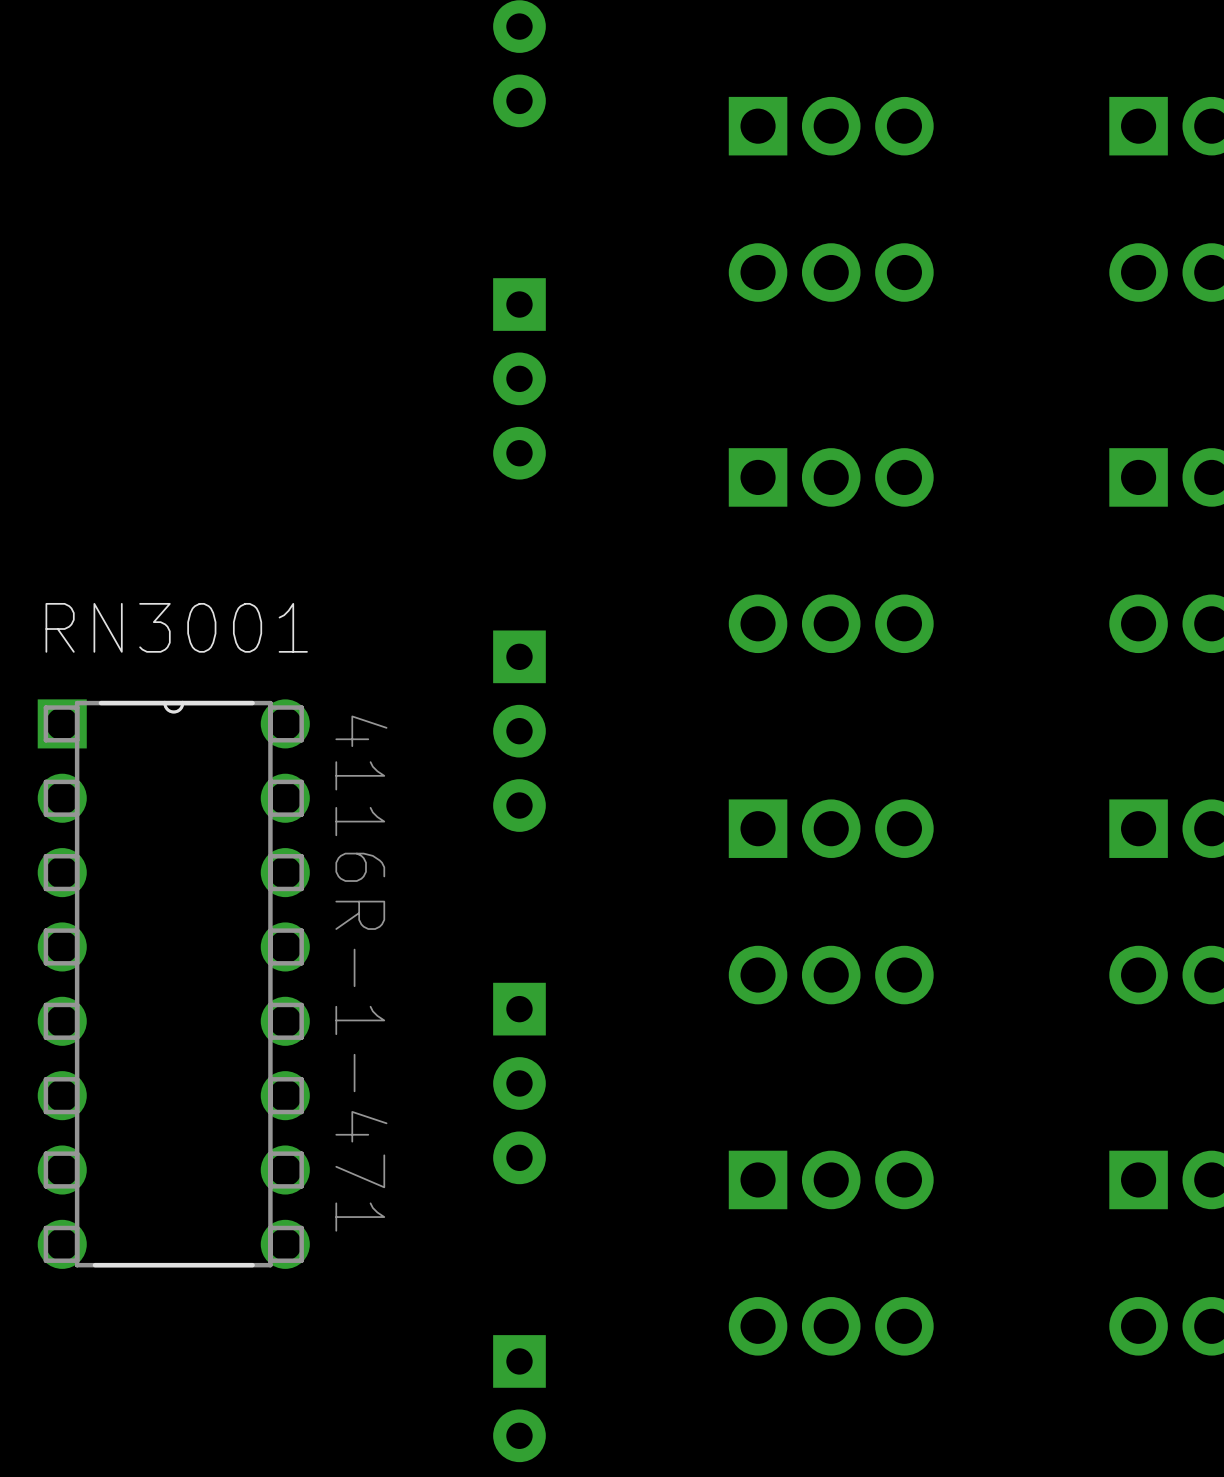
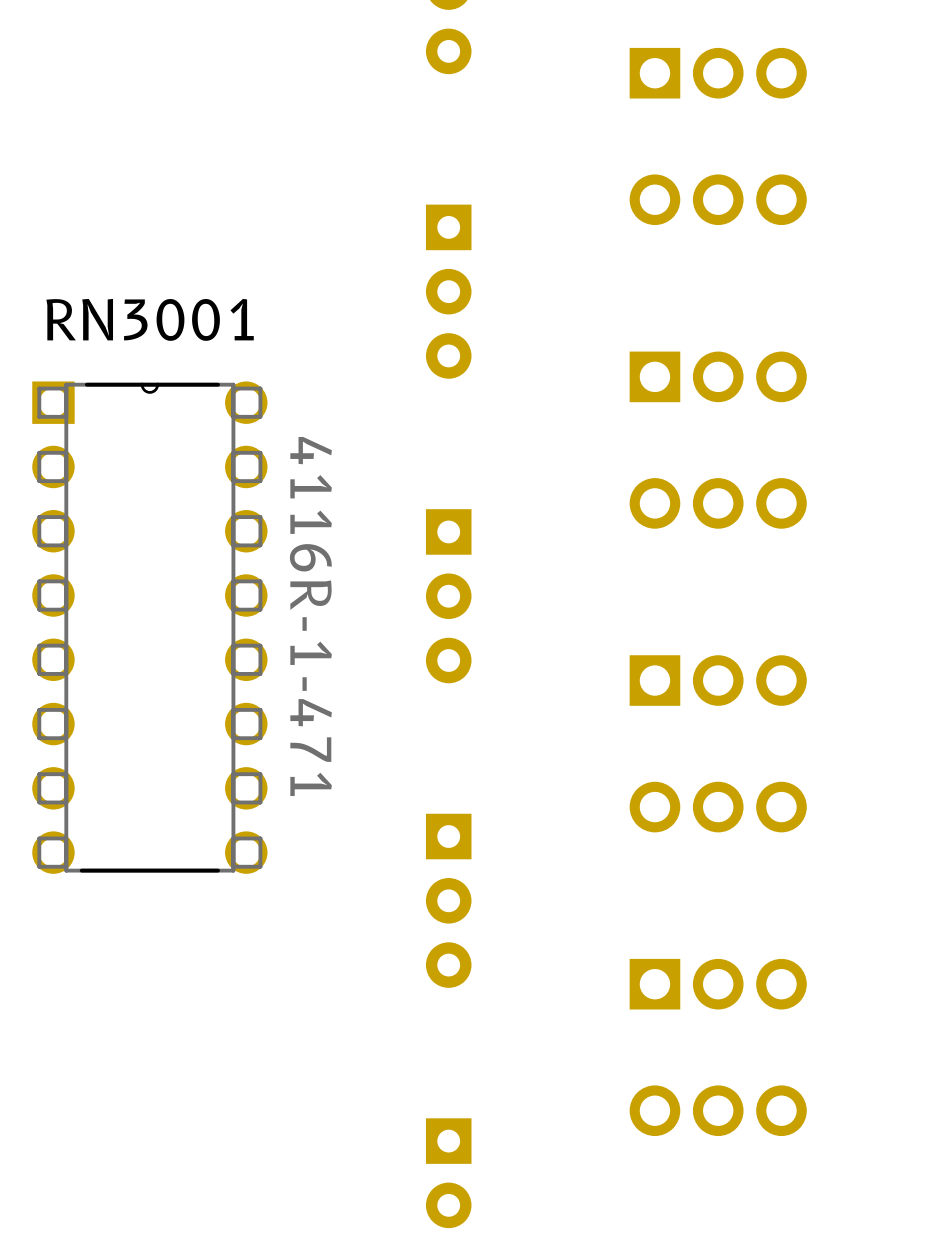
RN3001 position: (173, 984) -> (149, 627)

